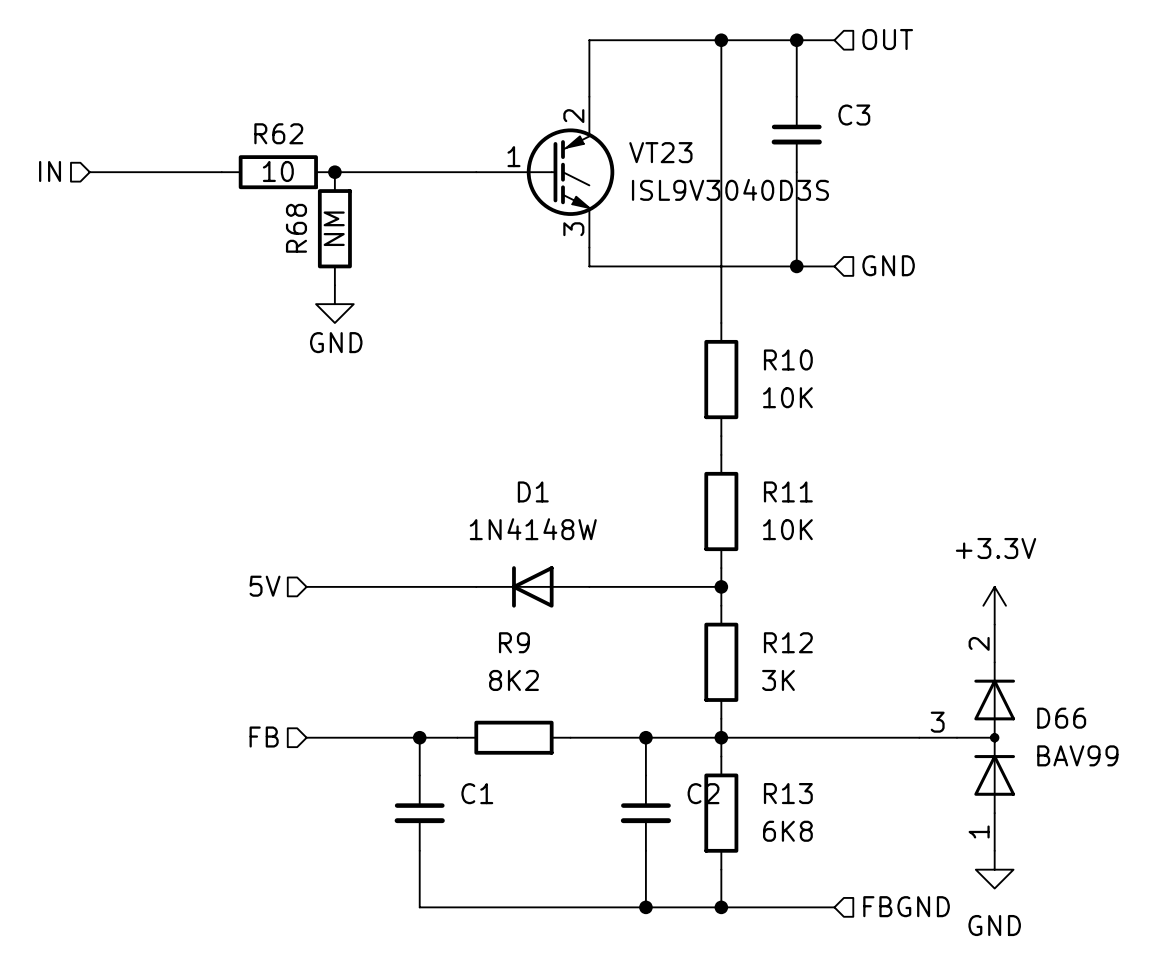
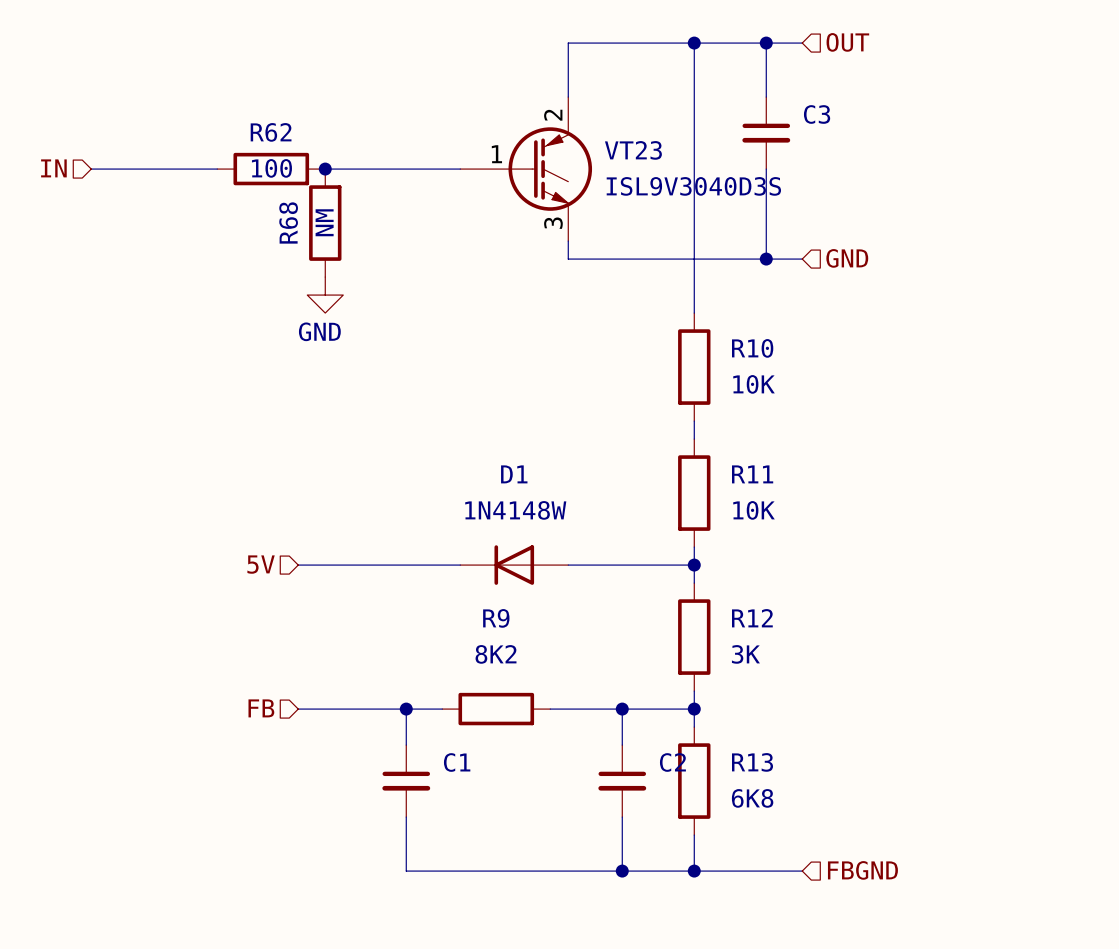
R62 value: 10 (278, 171) -> 100 (271, 168)
power symbol: +3.3V (994, 605) -> none
wire: (721, 737) (919, 737) -> none
D66: BAV99 (967, 737) -> none
power symbol: GND (994, 869) -> none

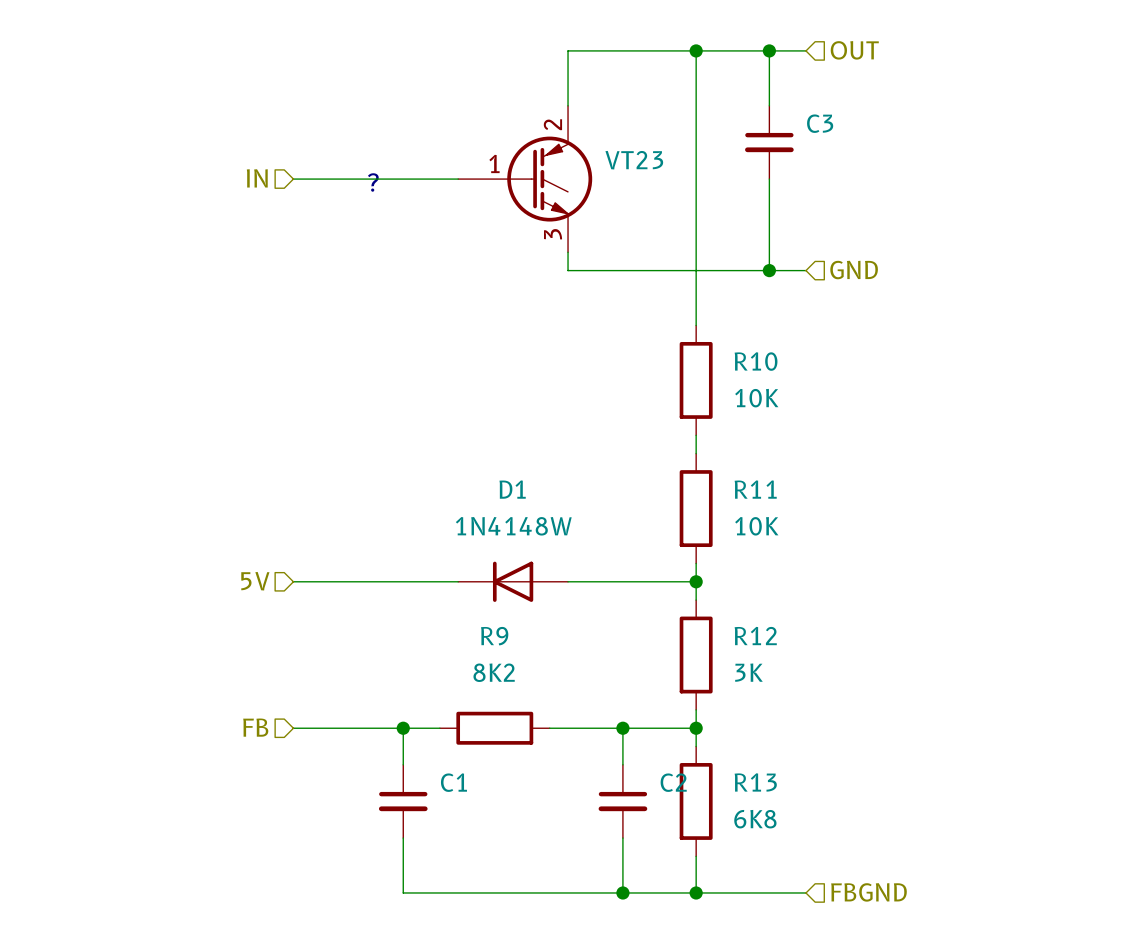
hierarchical label position: IN (53, 168) -> IN (257, 178)
wire: (91, 169) (217, 169) -> none
R62: 100 (271, 169) -> none
junction: (325, 169) -> none
text: none -> ? (373, 182)
VT23 value: ISL9V3040D3S (693, 186) -> none
R68: NM (325, 223) -> none
power symbol: GND (325, 295) -> none

